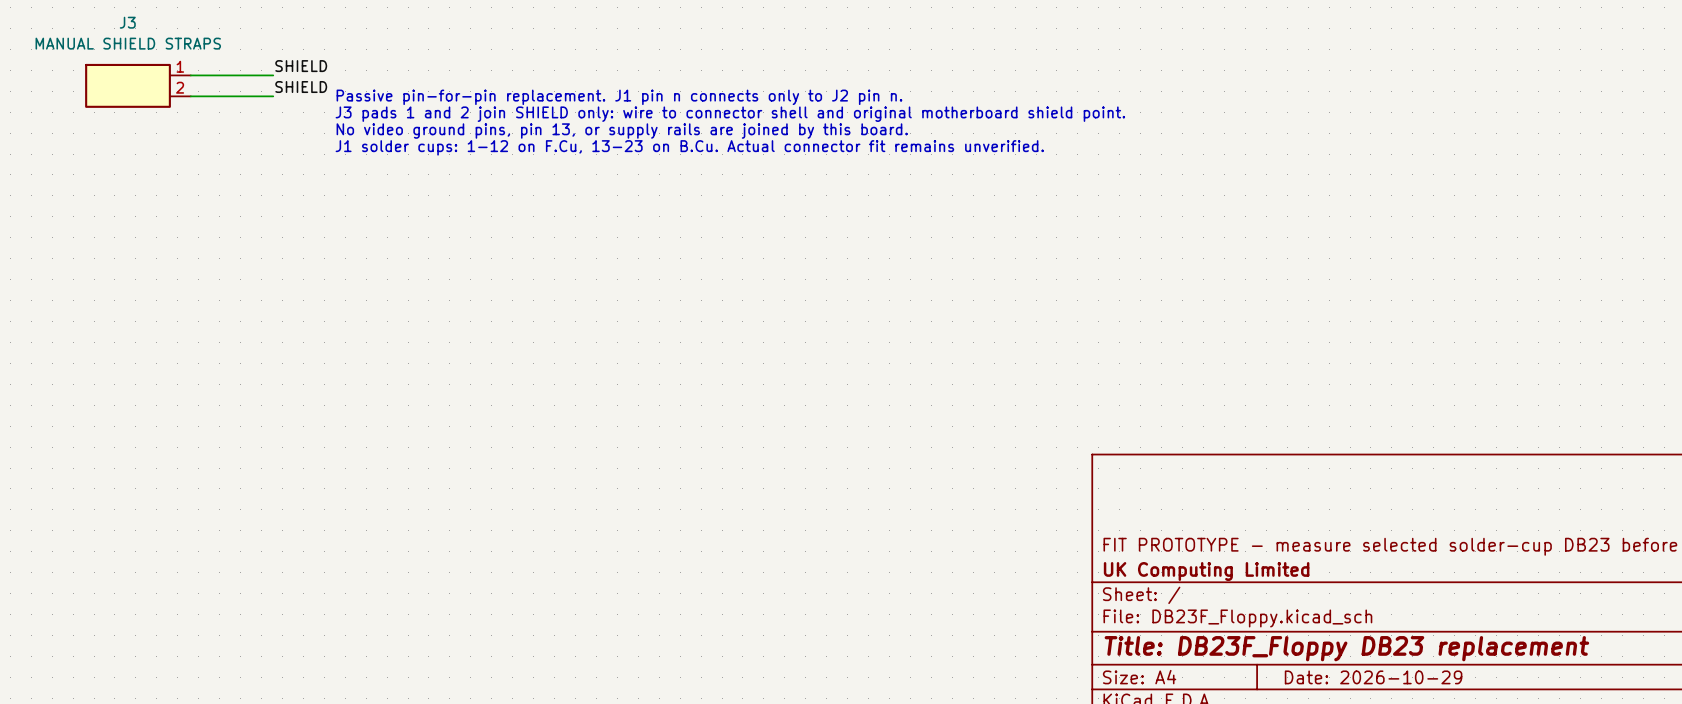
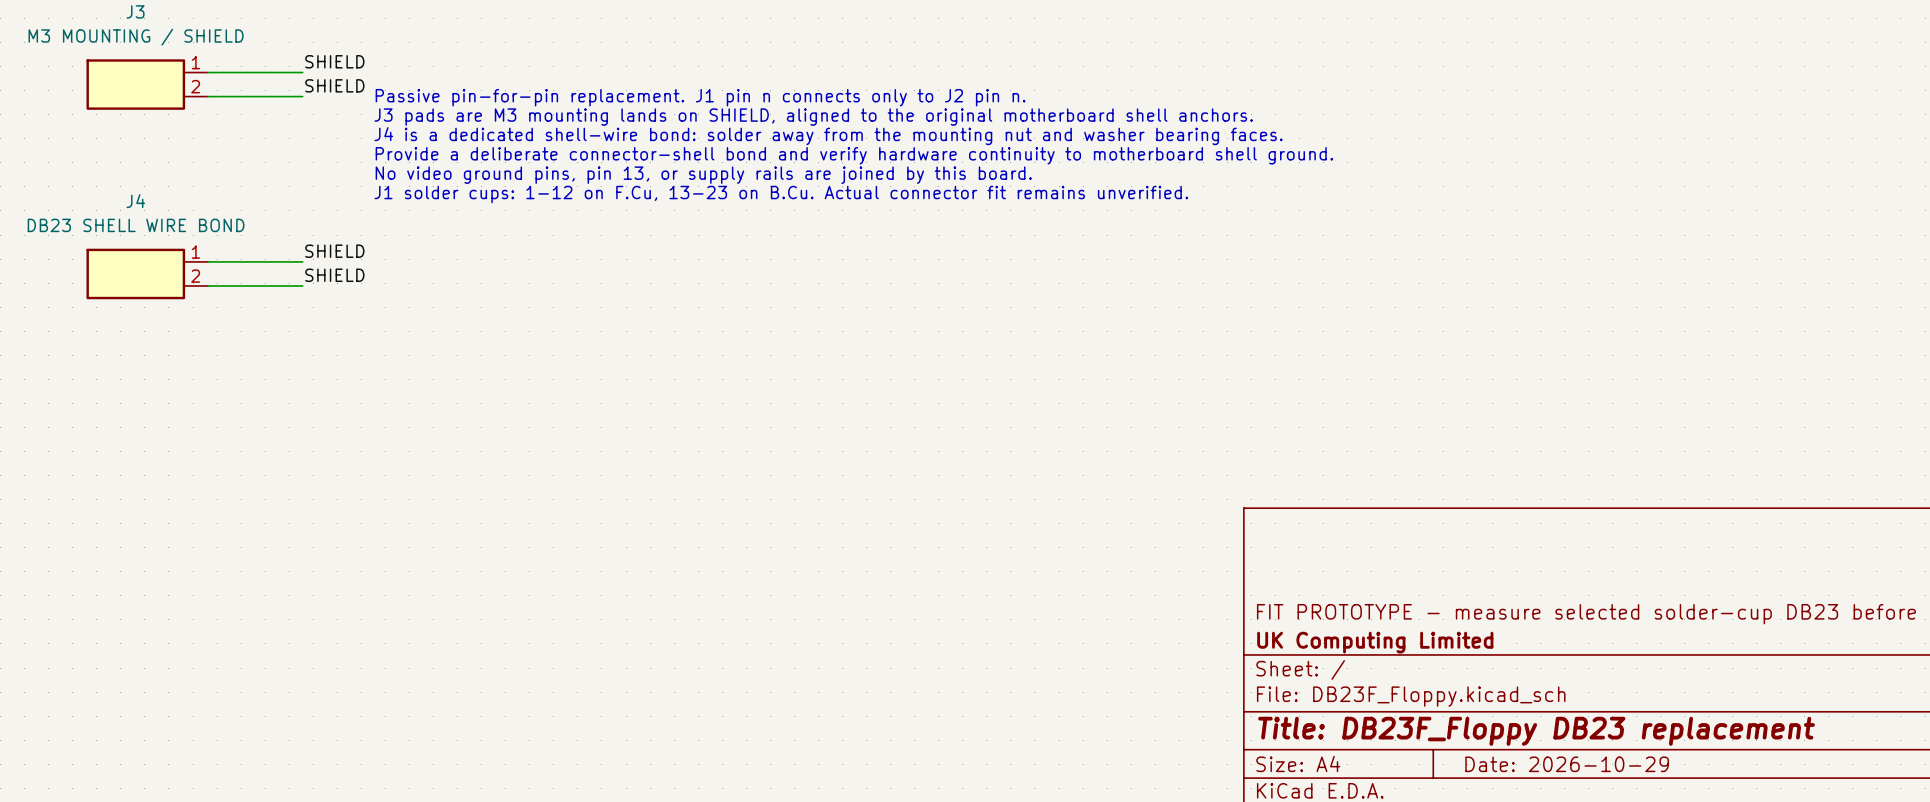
J3 value: MANUAL SHIELD STRAPS (128, 43) -> M3 MOUNTING / SHIELD (136, 37)
text: J3 pads 1 and 2 join SHIELD only: wire to connector shell and original motherboard shield point. (730, 114) -> J3 pads are M3 mounting lands on SHIELD, aligned to the original motherboard shell anchors. (813, 117)
text: No video ground pins, pin 13, or supply rails are joined by this board. (622, 131) -> J4 is a dedicated shell-wire bond: solder away from the mounting nut and washer bearing faces. (828, 136)
text: J1 solder cups: 1-12 on F.Cu, 13-23 on B.Cu. Actual connector fit remains unverified. (689, 147) -> Provide a deliberate connector-shell bond and verify hardware continuity to motherboard shell ground. (854, 155)
text: none -> No video ground pins, pin 13, or supply rails are joined by this board. (703, 175)
text: none -> J1 solder cups: 1-12 on F.Cu, 13-23 on B.Cu. Actual connector fit remains unverified. (781, 194)
label: none -> SHIELD (334, 251)
wire: none -> (207, 261) (302, 261)
J4: none -> DB23 SHELL WIRE BOND (147, 273)
label: none -> SHIELD (334, 275)
wire: none -> (207, 286) (302, 286)

